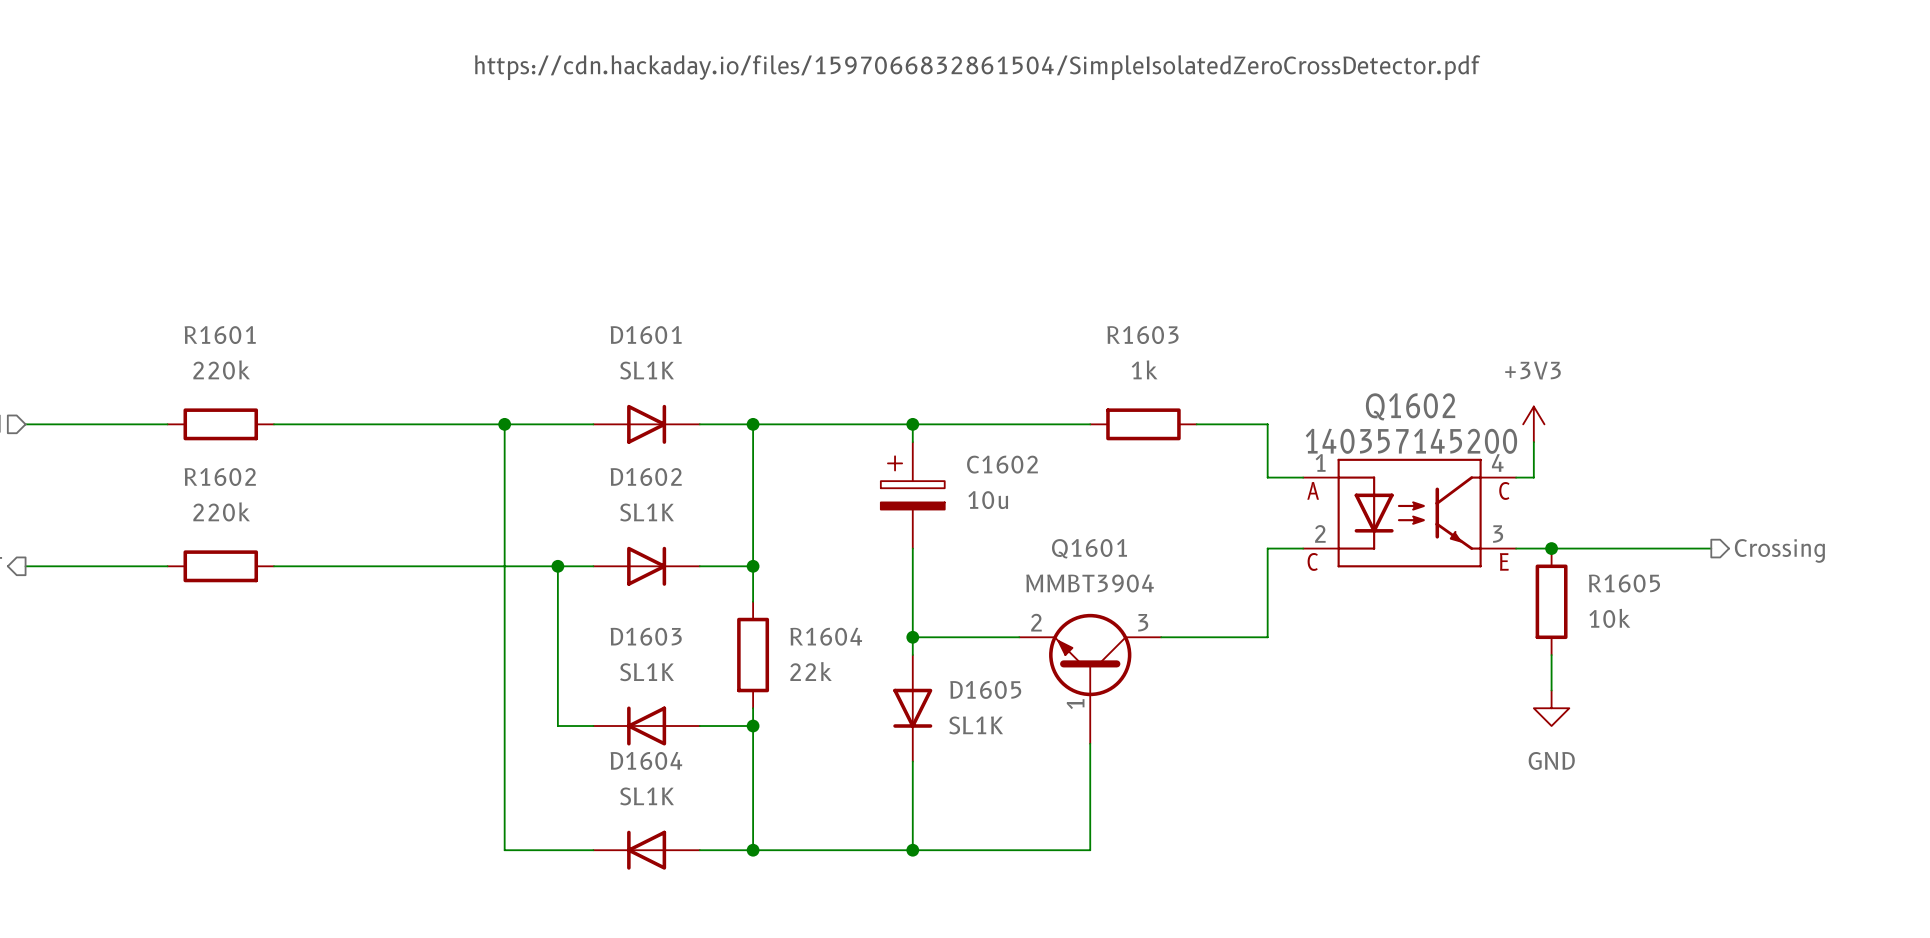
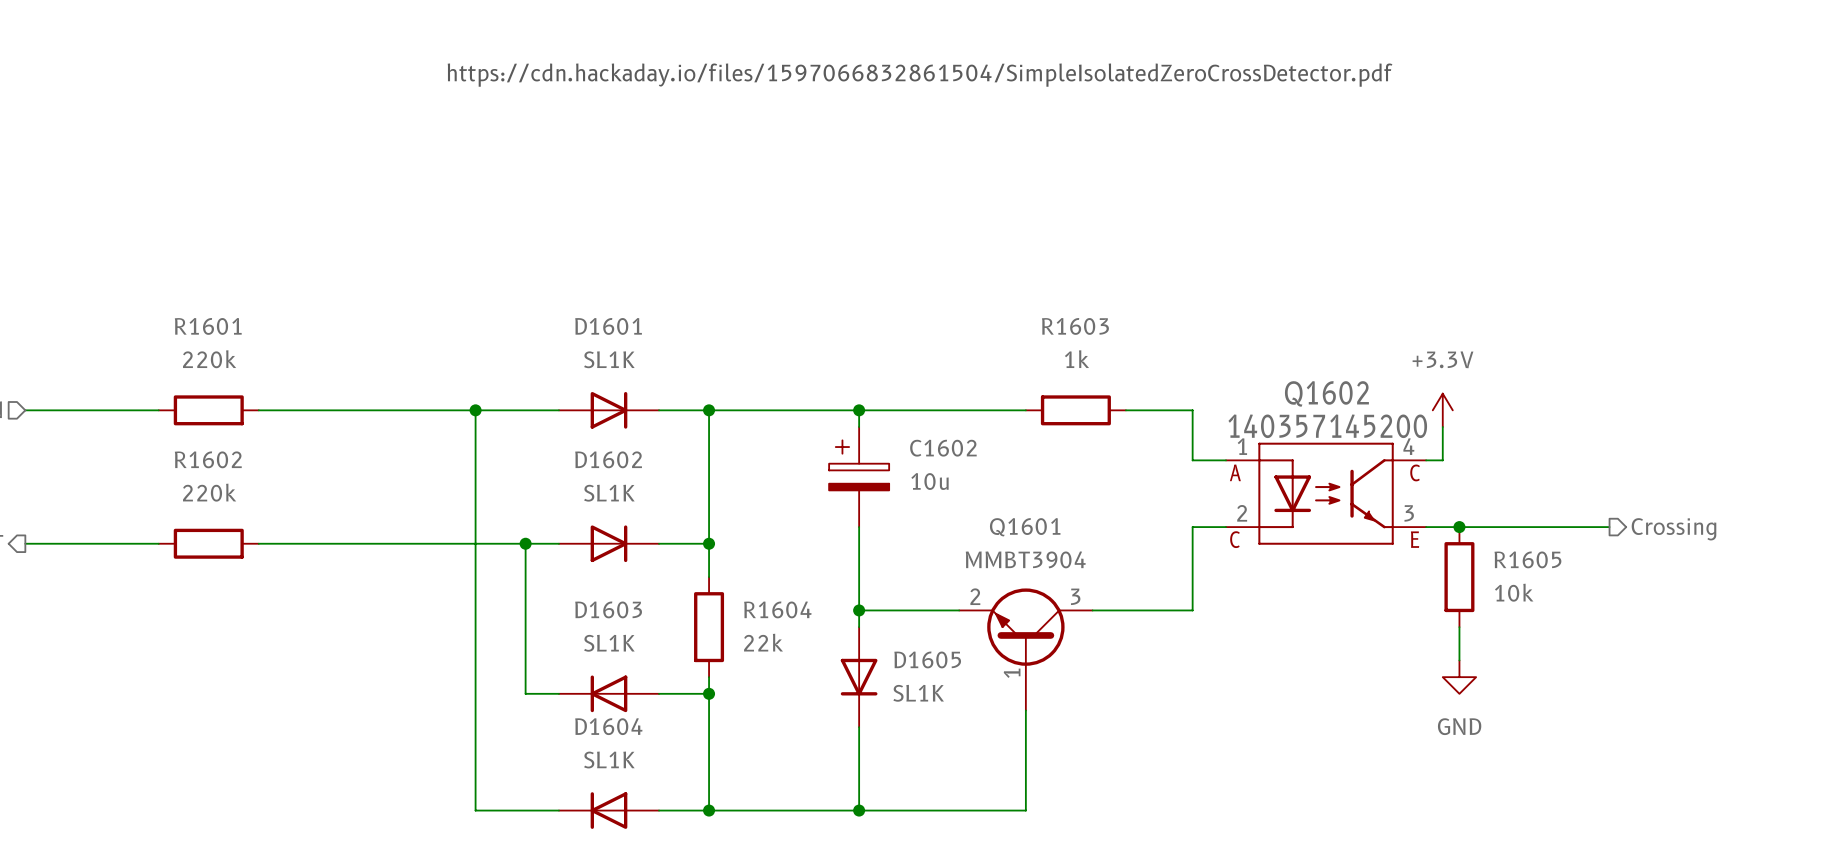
power symbol: +3V3 (1533, 424) -> +3.3V (1442, 410)

